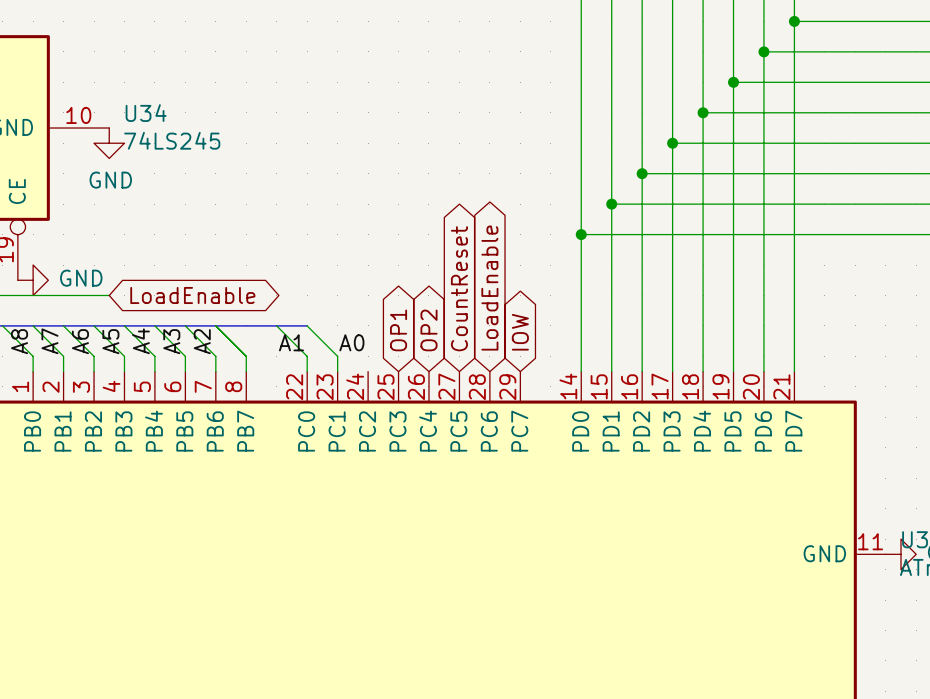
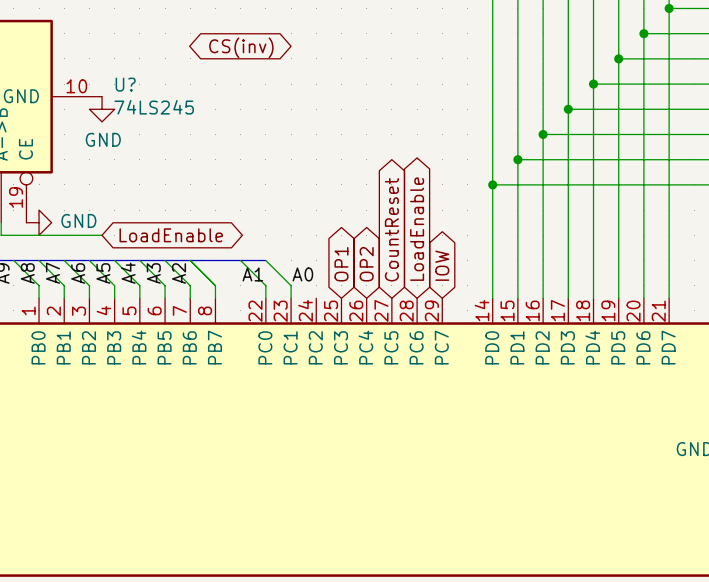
global label: none -> CS(inv) (241, 47)
U34 name: U34 (146, 113) -> U? (125, 84)

